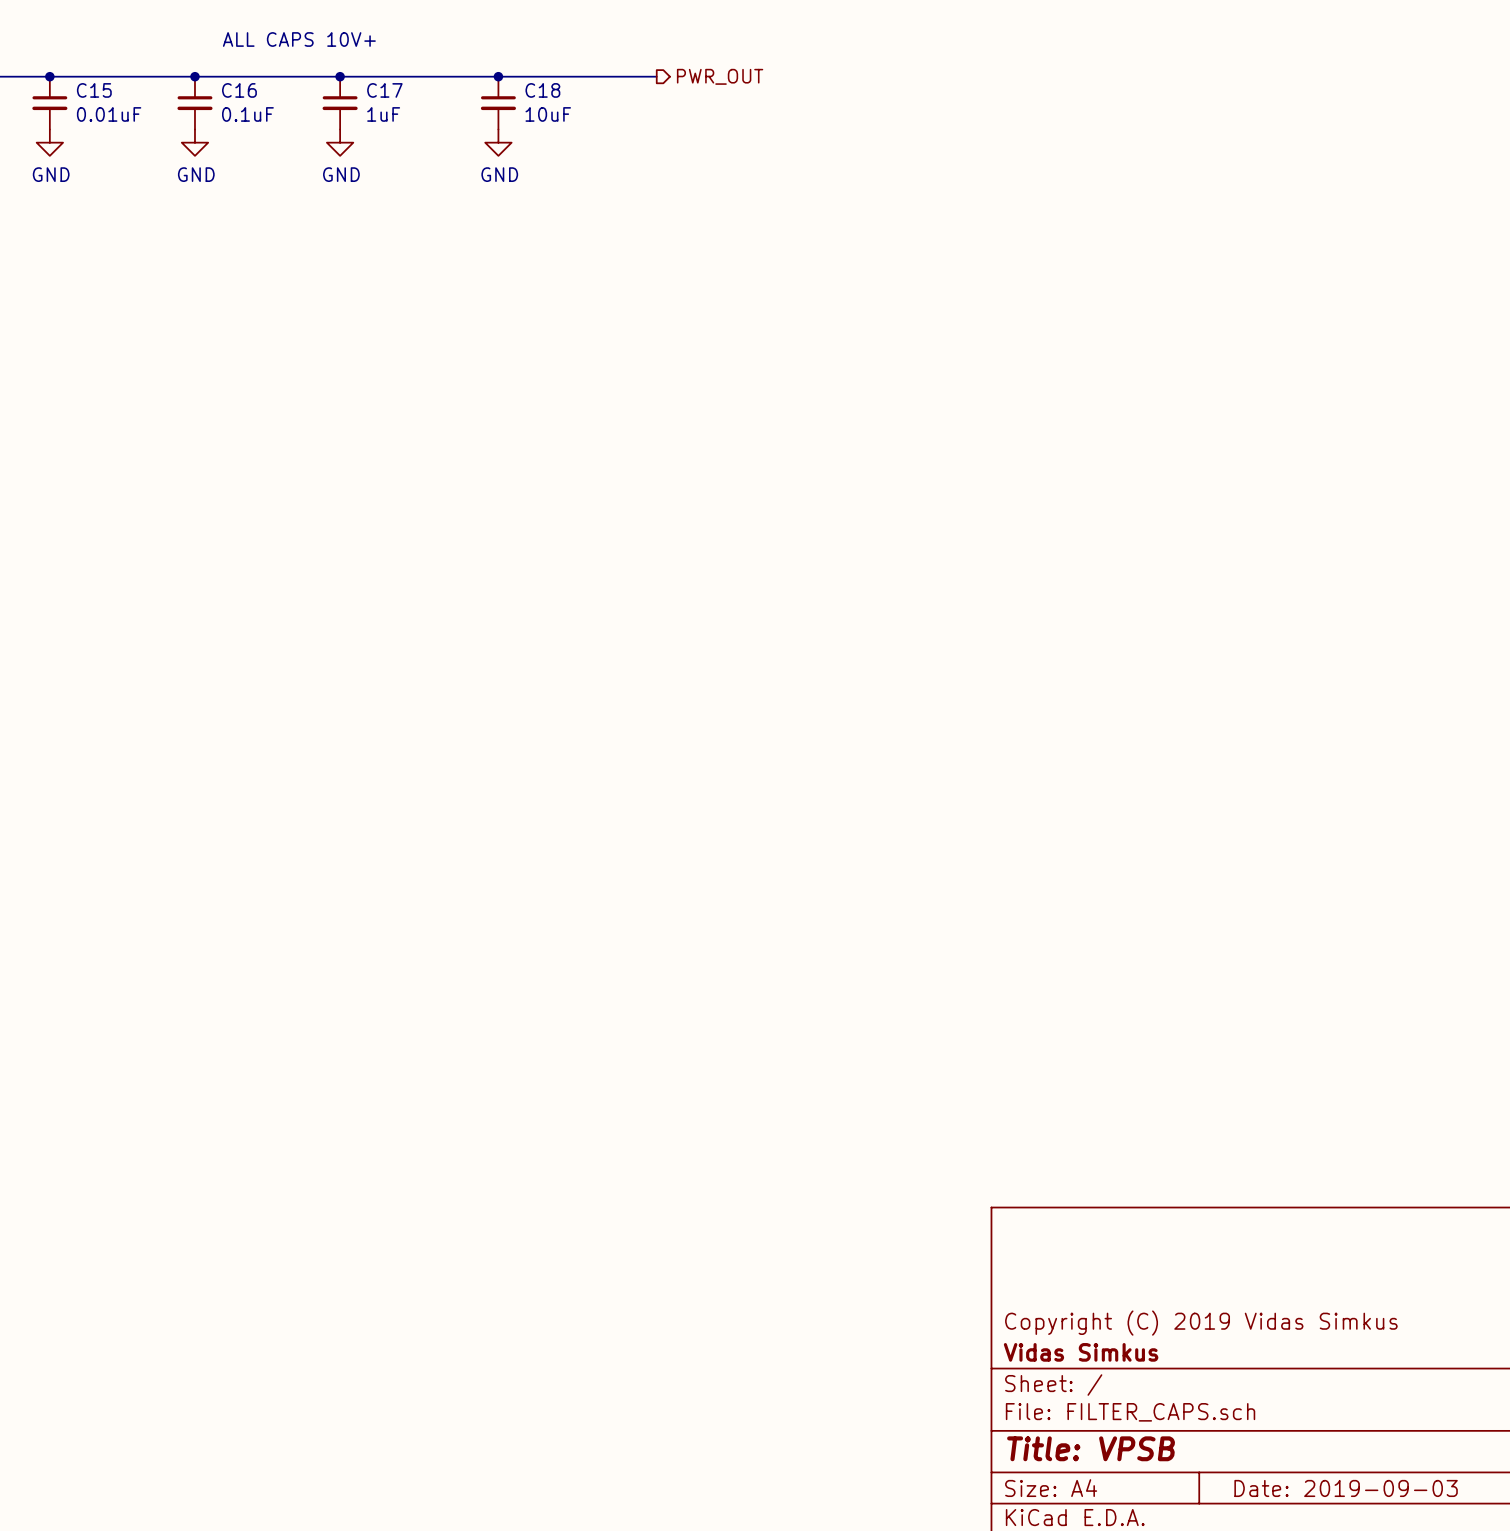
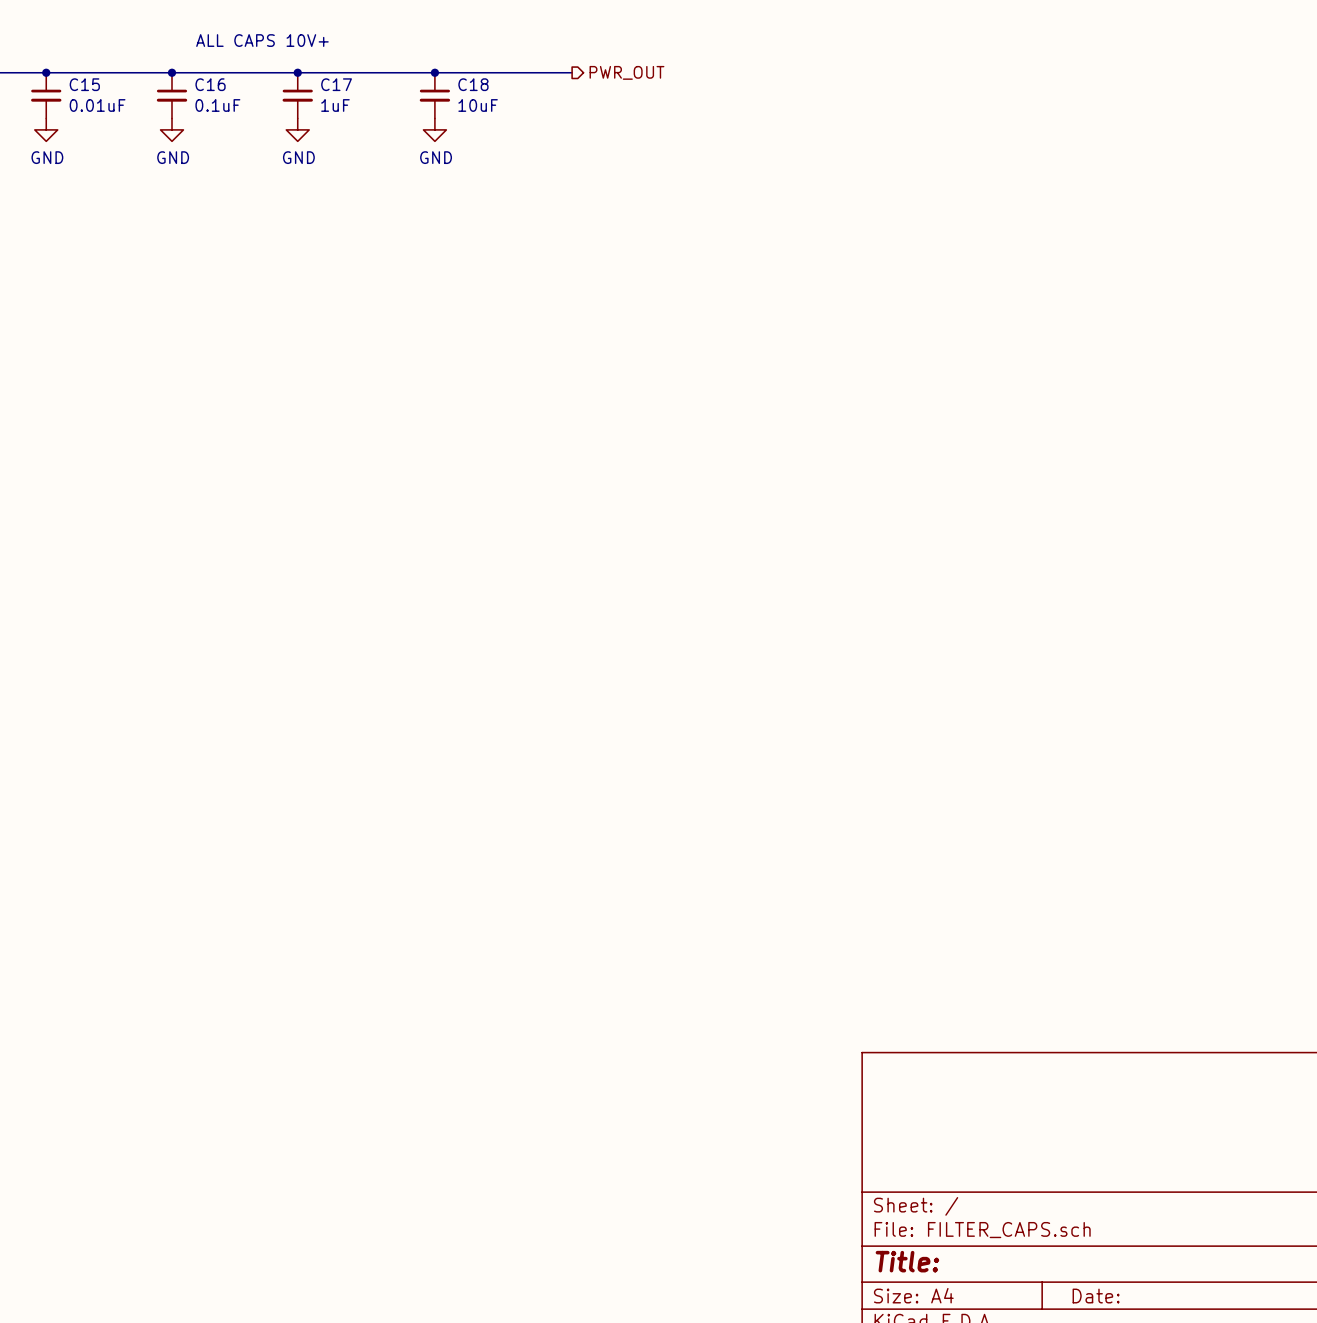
title block: Copyright (C) 2019 Vidas Simkus (1201, 1323) -> none
title block: Vidas Simkus (1081, 1352) -> none
title block: Title: VPSB (1091, 1448) -> Title: (907, 1261)
title block: Date: 2019-09-03 (1346, 1488) -> Date: (1096, 1296)

